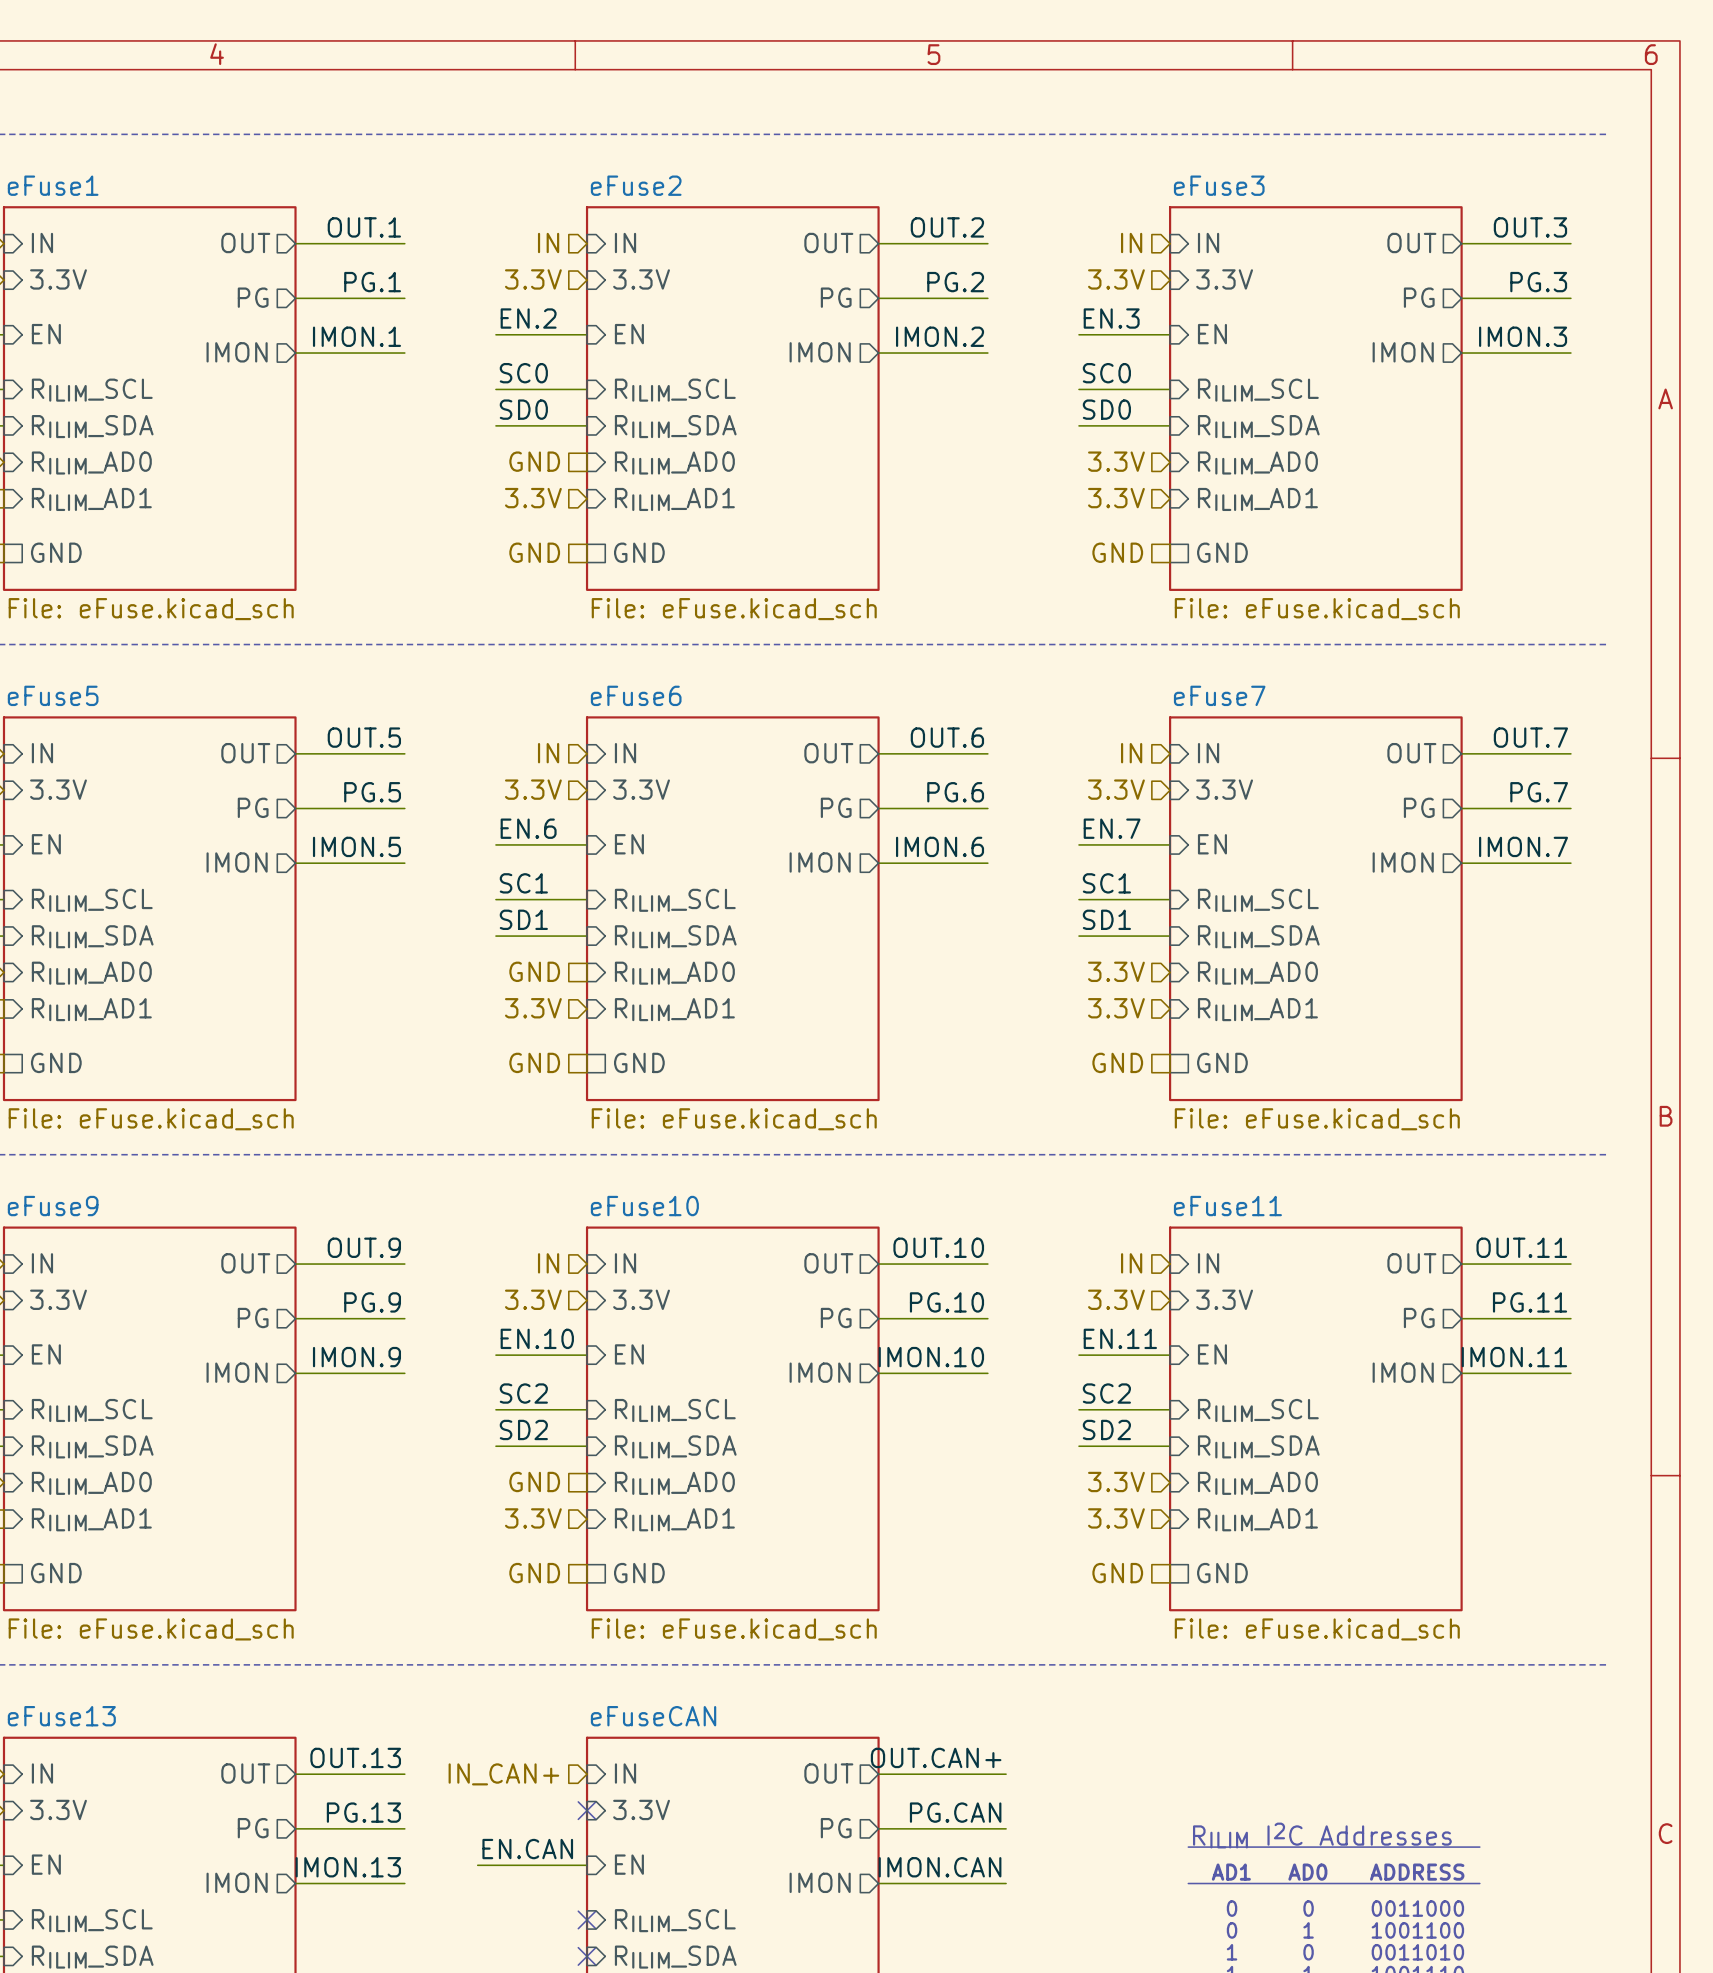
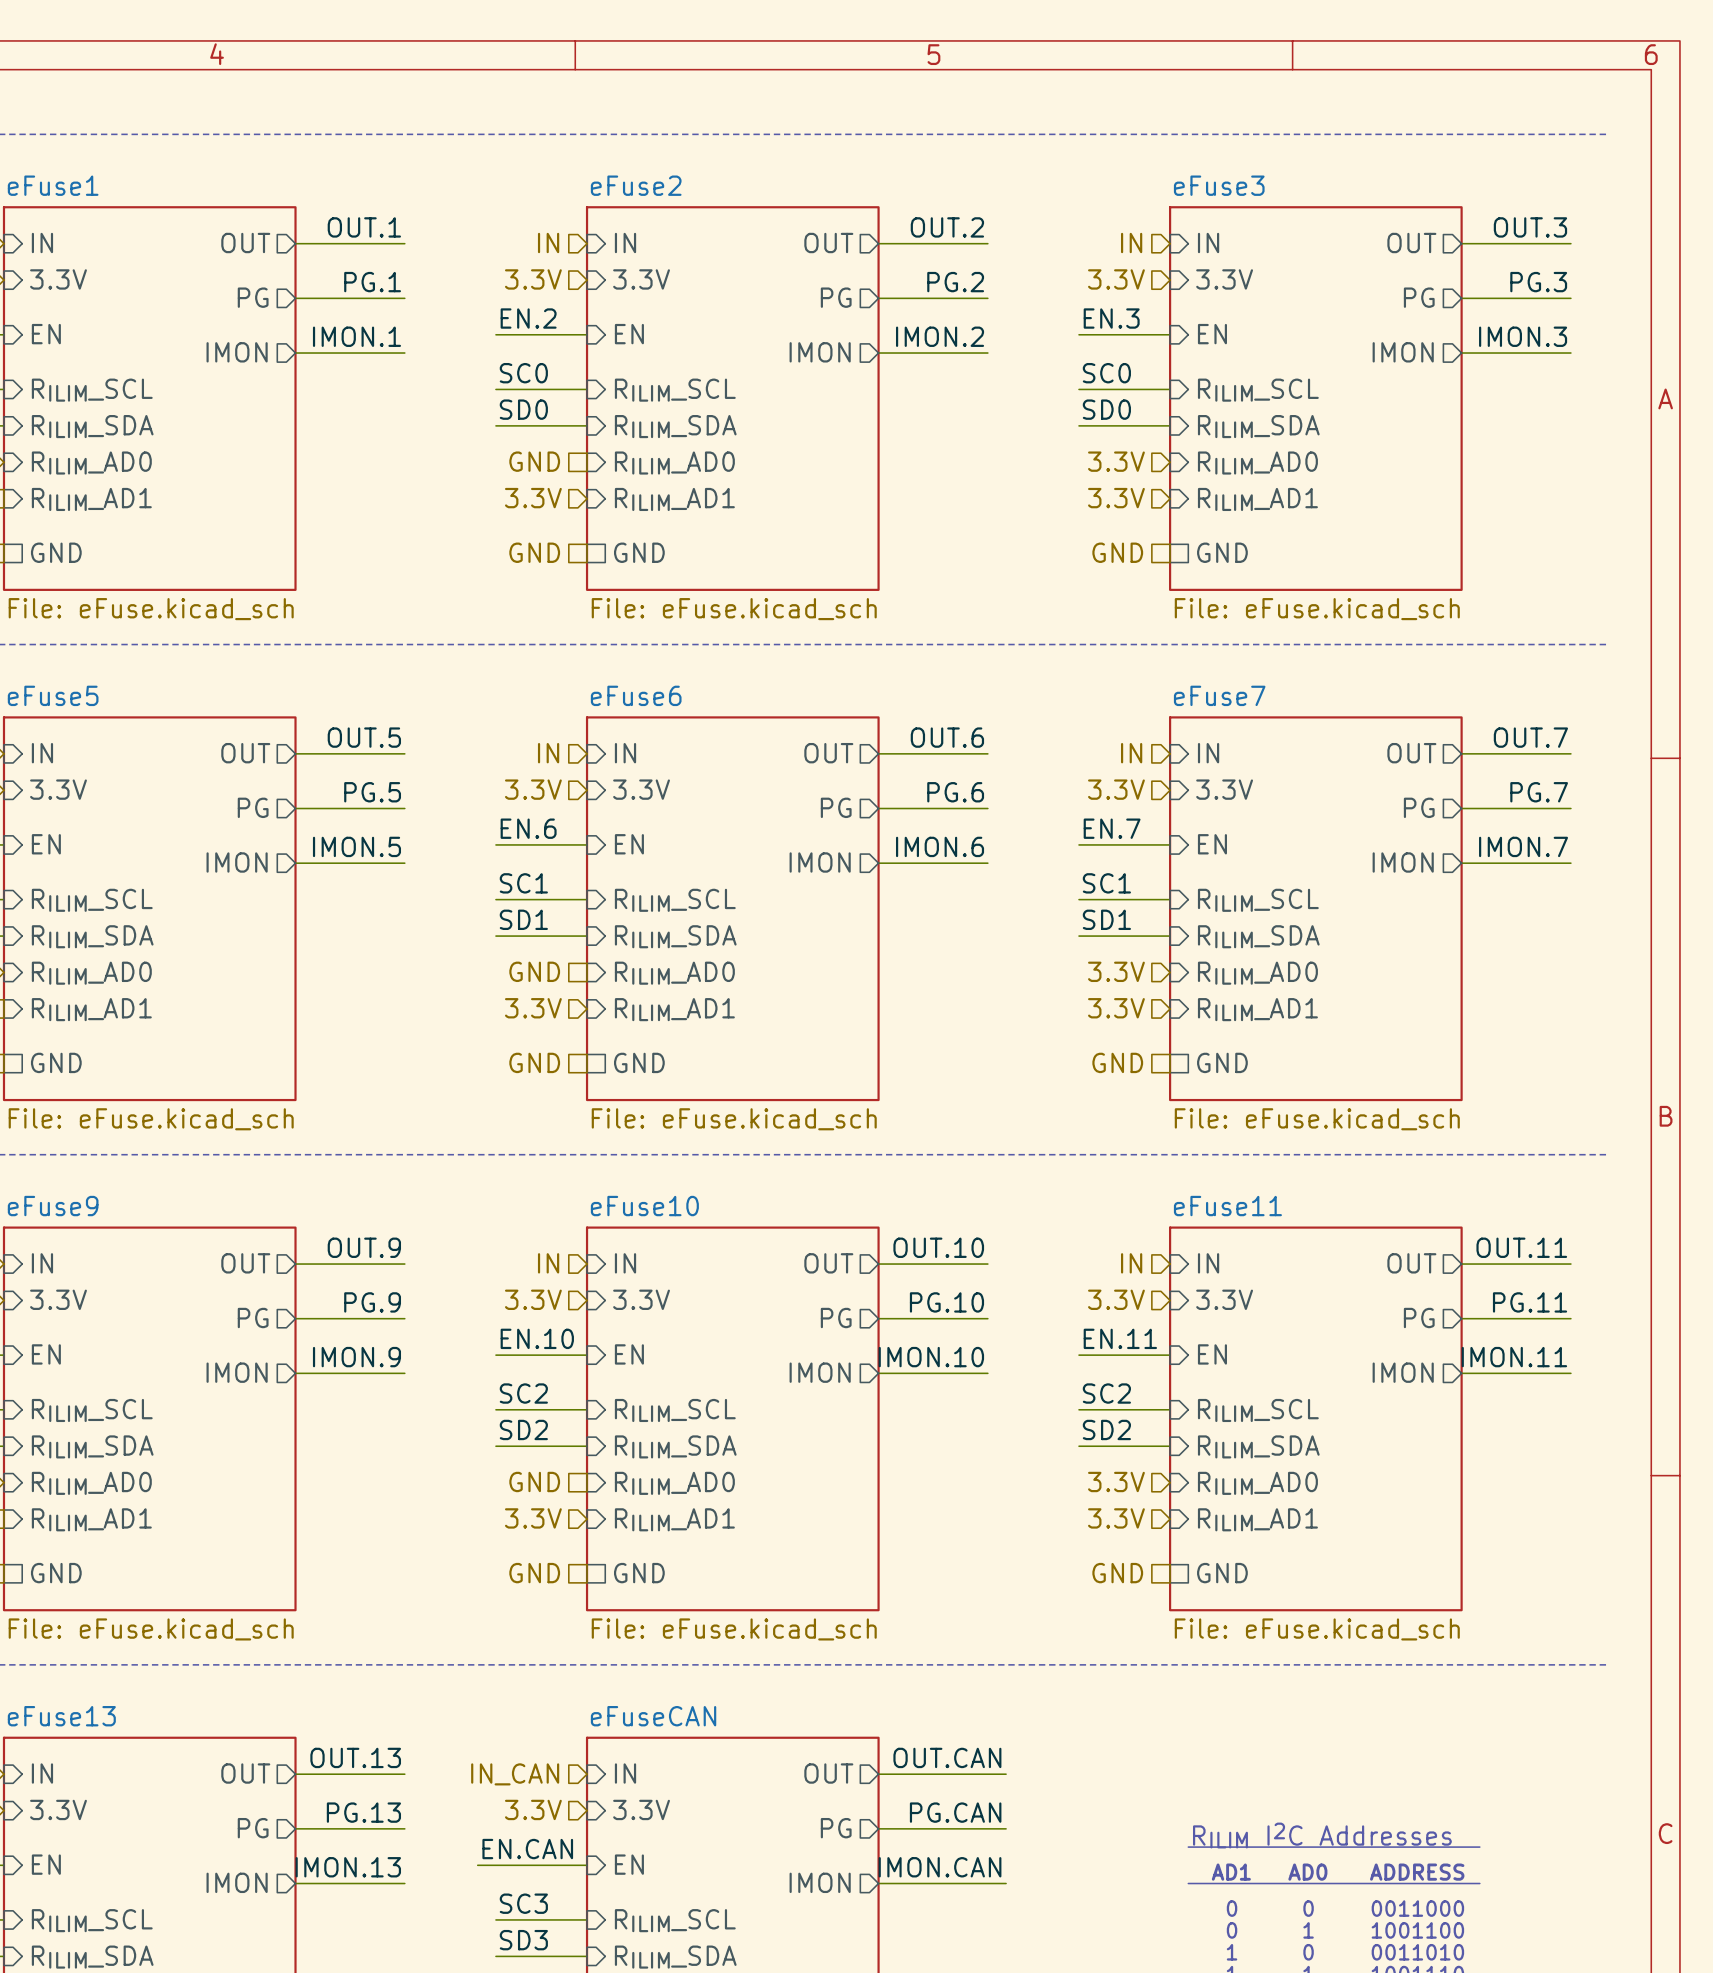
label: OUT.CAN+ (936, 1757) -> OUT.CAN (947, 1757)
hierarchical label: IN_CAN+ (503, 1774) -> IN_CAN (515, 1774)
hierarchical label: none -> 3.3V (533, 1809)
no-connect mark: (587, 1810) -> none
label: none -> SC3 (523, 1903)
wire: none -> (495, 1919) (587, 1919)
no-connect mark: (587, 1919) -> none
label: none -> SD3 (523, 1940)
wire: none -> (495, 1956) (587, 1956)
no-connect mark: (587, 1956) -> none

